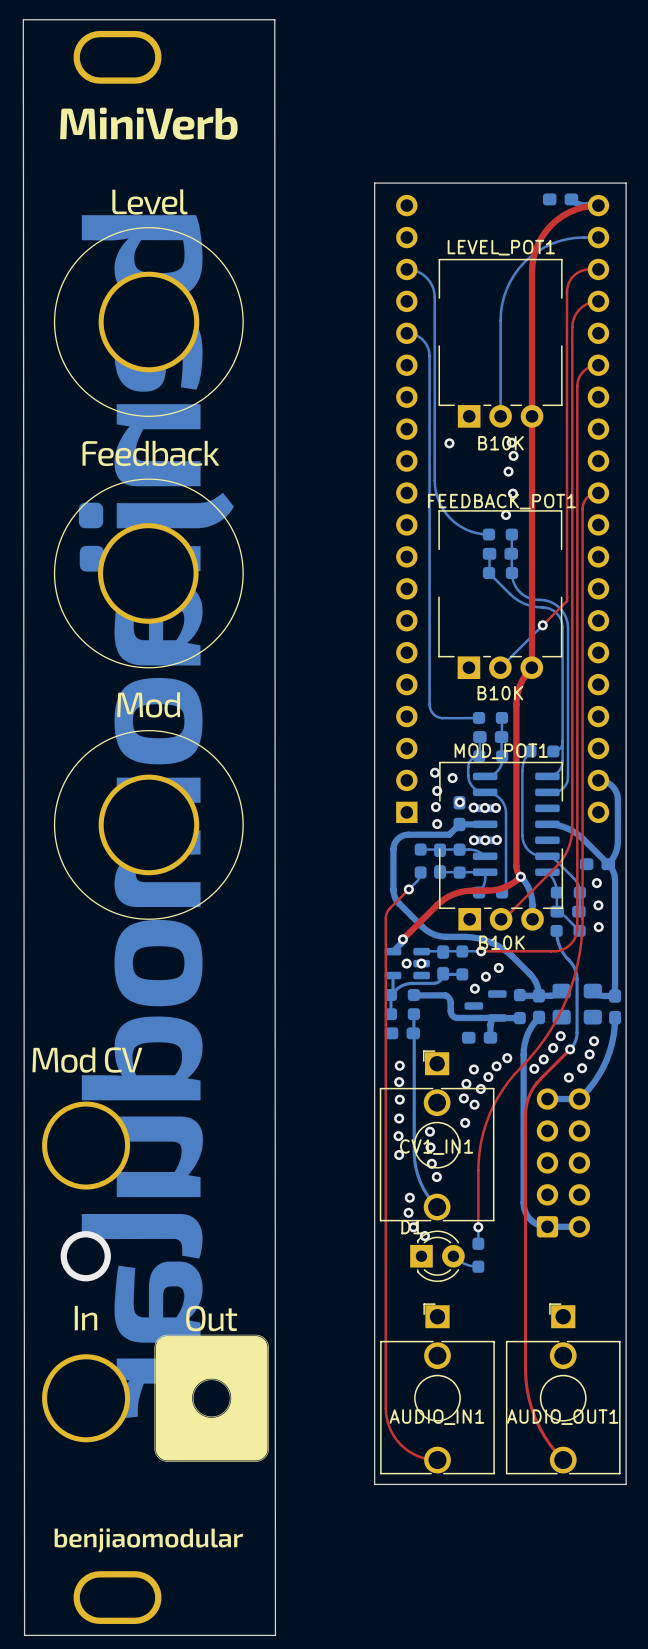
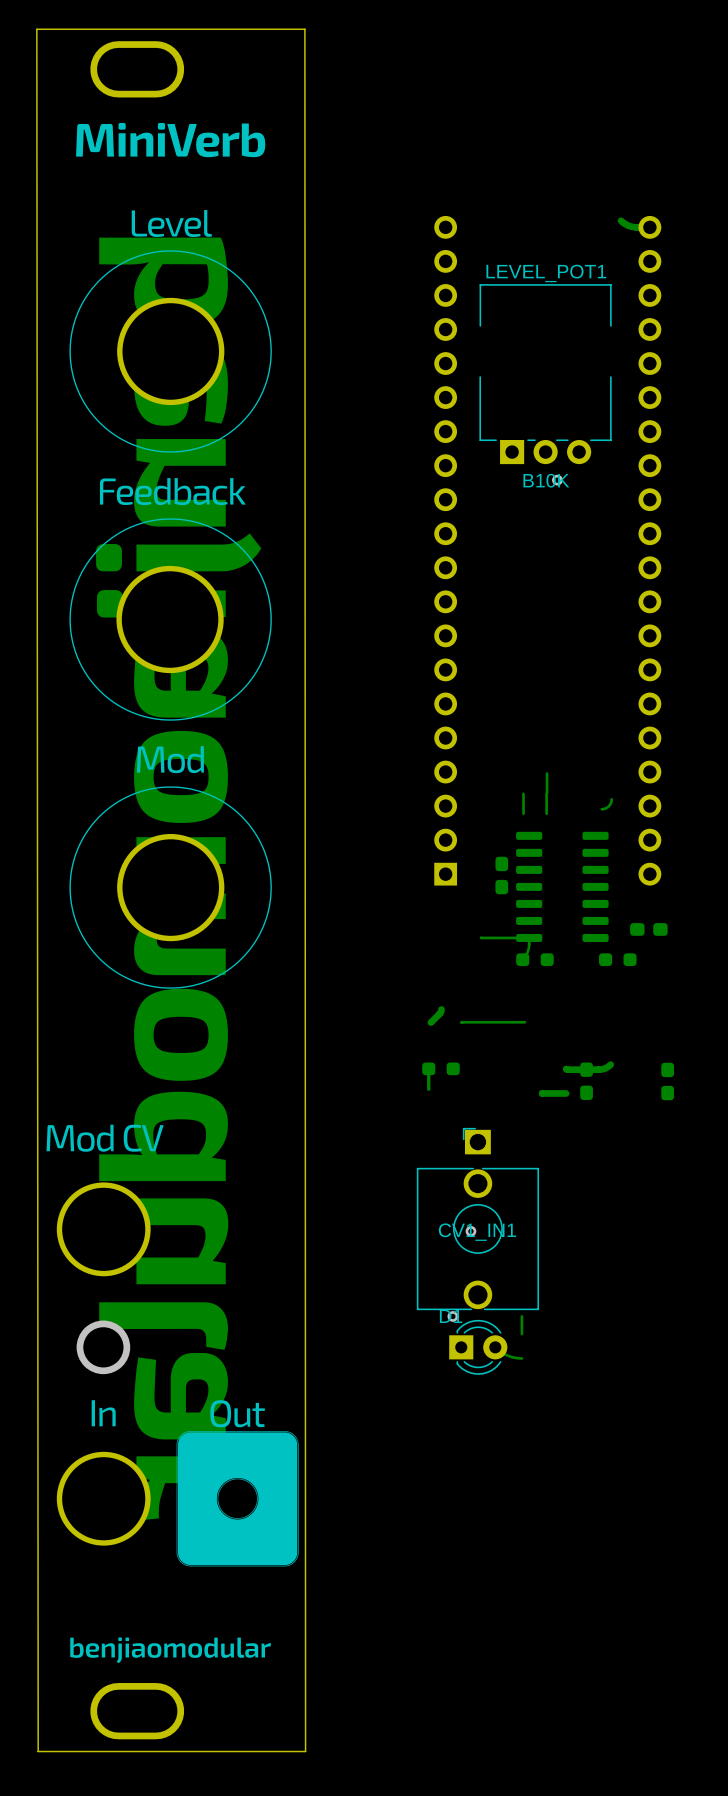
board edge: (374, 183) (374, 1484) (626, 1484) (626, 183) (374, 183) -> none
part: (560, 199) -> none
top track: (598, 205) (583, 207) (569, 212) (551, 225) (538, 243) (532, 264) (532, 667) (520, 684) (516, 704) (516, 866) (520, 876) (501, 888) (462, 891) (448, 896) (436, 905) (402, 939) -> none
bottom track: (598, 237) (567, 239) (544, 247) (524, 261) (510, 281) (504, 296) (501, 312) (500, 416) -> none
bottom track: (406, 269) (417, 271) (426, 277) (434, 293) (434, 480) (437, 498) (446, 514) (460, 526) (476, 533) (488, 534) -> none
top track: (598, 269) (586, 269) (578, 272) (570, 280) (567, 289) (567, 596) -> none
top track: (598, 301) (587, 303) (579, 309) (573, 318) (572, 327) (571, 838) (565, 853) (559, 862) (505, 917) (501, 919) -> none
bottom track: (406, 333) (416, 335) (422, 339) (429, 353) (429, 706) (433, 713) (440, 717) (478, 717) -> none
top track: (598, 365) (591, 366) (583, 371) (579, 377) (577, 386) (577, 930) (574, 939) (568, 945) (561, 950) (550, 951) -> none
via: (449, 443) -> none
via: (513, 455) -> none
via: (508, 471) -> none
via: (512, 493) -> none
top track: (598, 493) (587, 497) (582, 508) (582, 918) (579, 954) (570, 988) (556, 1020) (536, 1049) (502, 1089) (486, 1123) (478, 1160) (478, 1227) -> none
via: (506, 515) -> none
part: (500, 534) -> none
bottom track: (511, 534) (511, 572) (516, 587) (527, 597) (547, 600) (557, 605) (564, 613) (567, 624) (567, 779) (564, 786) (560, 790) (547, 792) -> none
bottom track: (489, 553) (489, 573) (510, 594) (524, 603) (553, 610) (562, 623) (562, 763) (558, 771) (547, 776) -> none
part: (500, 553) -> none
part: (500, 573) -> none
FEEDBACK_POT1: B10K (500, 594) -> none
top track: (567, 596) (567, 600) (542, 625) -> none
bottom track: (542, 625) (500, 667) -> none
via: (542, 625) -> none
part: (490, 717) -> none
part: (490, 737) -> none
bottom track: (530, 751) (522, 767) (523, 842) (526, 848) (534, 854) (551, 856) (575, 880) (579, 889) (579, 909) -> none
part: (541, 751) -> none
bottom track: (479, 756) (473, 757) (469, 762) (469, 782) (477, 790) (498, 796) (502, 802) (505, 810) (506, 883) (502, 892) -> none
part: (490, 756) -> none
bottom track: (502, 756) (498, 770) (492, 774) (485, 776) -> none
via: (434, 772) -> none
via: (452, 778) -> none
bottom track: (598, 780) (610, 784) (617, 797) (617, 845) (615, 853) (608, 864) -> none
via: (437, 790) -> none
via: (459, 802) -> none
via: (435, 807) -> none
via: (473, 807) -> none
via: (484, 807) -> none
via: (495, 807) -> none
via: (437, 824) -> none
bottom track: (485, 824) (459, 824) (449, 834) (408, 834) (399, 837) (393, 847) (393, 890) -> none
bottom track: (547, 824) (562, 826) (575, 832) (608, 864) -> none
via: (473, 840) -> none
via: (485, 840) -> none
via: (496, 840) -> none
MOD_POT1: B10K (501, 846) -> none
bottom track: (420, 849) (472, 849) (485, 856) -> none
part: (420, 861) -> none
part: (440, 861) -> none
part: (459, 861) -> none
bottom track: (608, 864) (613, 871) (615, 880) (615, 996) (601, 995) (592, 991) -> none
bottom track: (420, 872) (418, 879) (408, 889) -> none
bottom track: (547, 872) (555, 885) (556, 910) -> none
bottom track: (520, 876) (531, 895) (532, 919) -> none
via: (520, 876) -> none
via: (596, 883) -> none
top track: (408, 889) (388, 909) (385, 918) (385, 1408) (388, 1425) (400, 1444) (420, 1457) (437, 1460) -> none
via: (408, 889) -> none
bottom track: (393, 890) (397, 902) (429, 932) (441, 936) (478, 938) (490, 942) (506, 951) (532, 977) (537, 987) (539, 995) -> none
via: (598, 905) -> none
part: (568, 911) -> none
bottom track: (562, 913) (579, 930) -> none
via: (598, 927) -> none
bottom track: (556, 930) (559, 946) (573, 966) (576, 976) (576, 1034) (570, 1049) -> none
part: (568, 930) -> none
via: (402, 939) -> none
top track: (481, 951) (550, 951) -> none
via: (481, 951) -> none
part: (443, 962) -> none
part: (462, 962) -> none
via: (406, 963) -> none
part: (407, 963) -> none
via: (421, 963) -> none
via: (498, 967) -> none
bottom track: (462, 974) (443, 973) (441, 979) (435, 983) (405, 984) (390, 994) (392, 990) (393, 975) -> none
via: (485, 976) -> none
via: (474, 988) -> none
bottom track: (414, 995) (446, 995) (450, 1000) (451, 1014) (456, 1017) (497, 1017) (490, 1022) (490, 1037) -> none
part: (561, 1004) -> none
part: (592, 1004) -> none
part: (485, 1005) -> none
part: (519, 1006) -> none
part: (402, 1014) -> none
bottom track: (413, 1014) (414, 1159) (417, 1174) (423, 1188) (437, 1207) -> none
bottom track: (539, 1017) (529, 1029) (523, 1049) (523, 1206) (528, 1217) (538, 1224) (579, 1226) -> none
bottom track: (615, 1017) (612, 1043) (606, 1059) (588, 1089) (579, 1099) (547, 1099) -> none
part: (402, 1033) -> none
via: (560, 1036) -> none
part: (479, 1037) -> none
via: (594, 1041) -> none
via: (553, 1048) -> none
top track: (570, 1049) (540, 1078) -> none
via: (570, 1049) -> none
via: (589, 1054) -> none
via: (507, 1058) -> none
via: (543, 1059) -> none
via: (399, 1065) -> none
via: (496, 1066) -> none
via: (534, 1068) -> none
via: (582, 1068) -> none
via: (473, 1069) -> none
via: (488, 1077) -> none
via: (568, 1077) -> none
top track: (540, 1079) (528, 1098) (525, 1115) (525, 1379) (529, 1399) (535, 1418) (544, 1436) (563, 1460) -> none
via: (399, 1082) -> none
via: (466, 1083) -> none
via: (480, 1088) -> none
via: (463, 1098) -> none
via: (399, 1099) -> none
via: (474, 1104) -> none
via: (399, 1118) -> none
via: (465, 1122) -> none
via: (429, 1131) -> none
via: (398, 1136) -> none
via: (399, 1154) -> none
part: (563, 1162) -> none
via: (431, 1163) -> none
via: (436, 1176) -> none
via: (409, 1197) -> none
via: (408, 1212) -> none
via: (478, 1227) -> none
via: (424, 1236) -> none
part: (478, 1255) -> none
AUDIO_IN1: (437, 1388) -> none
AUDIO_OUT1: (563, 1388) -> none

